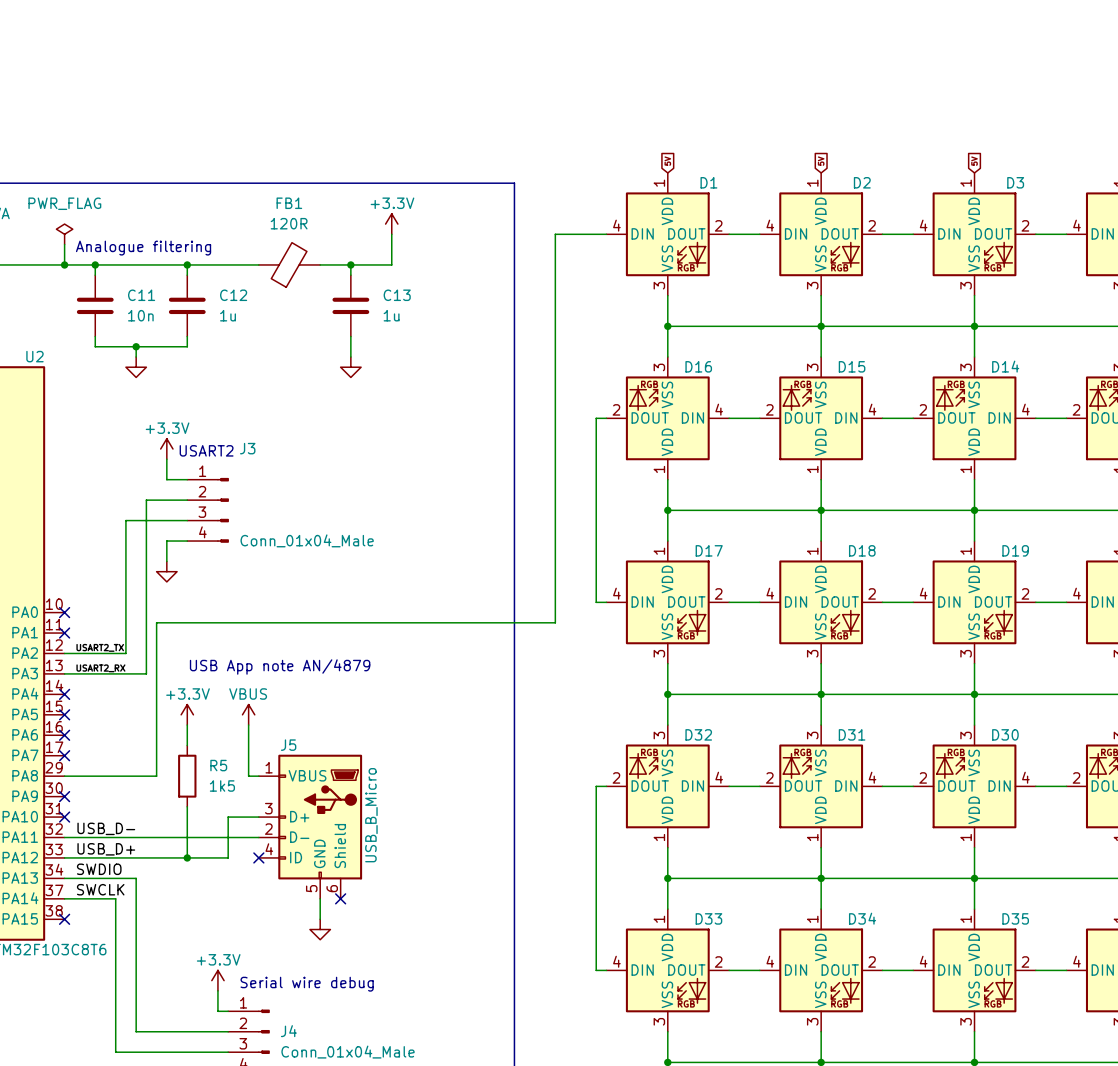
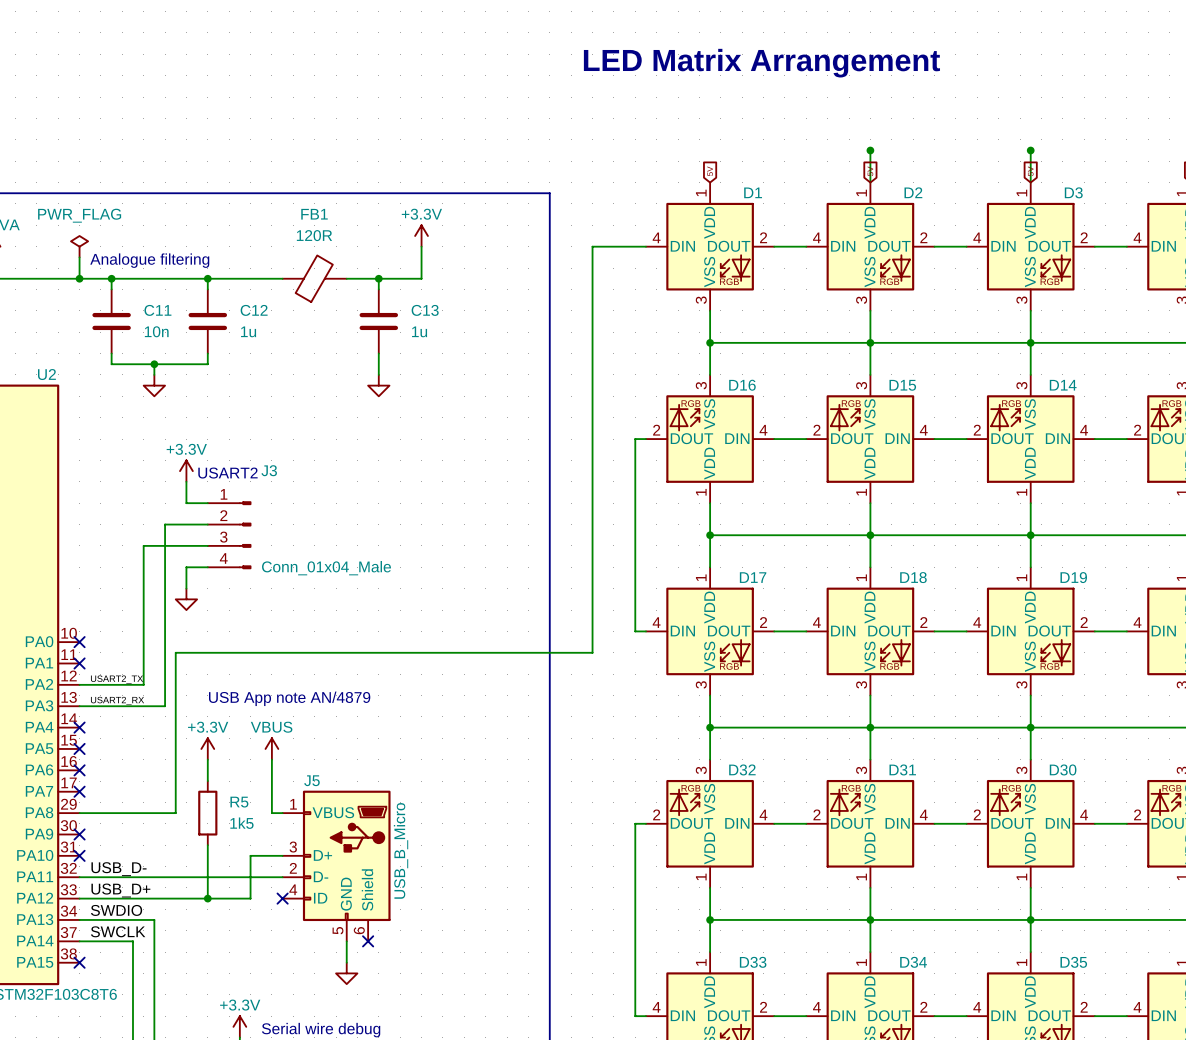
text: none -> LED Matrix Arrangement (761, 63)
wire: none -> (870, 150) (870, 182)
junction: none -> (870, 150)
wire: none -> (1030, 150) (1030, 182)
junction: none -> (1030, 150)

